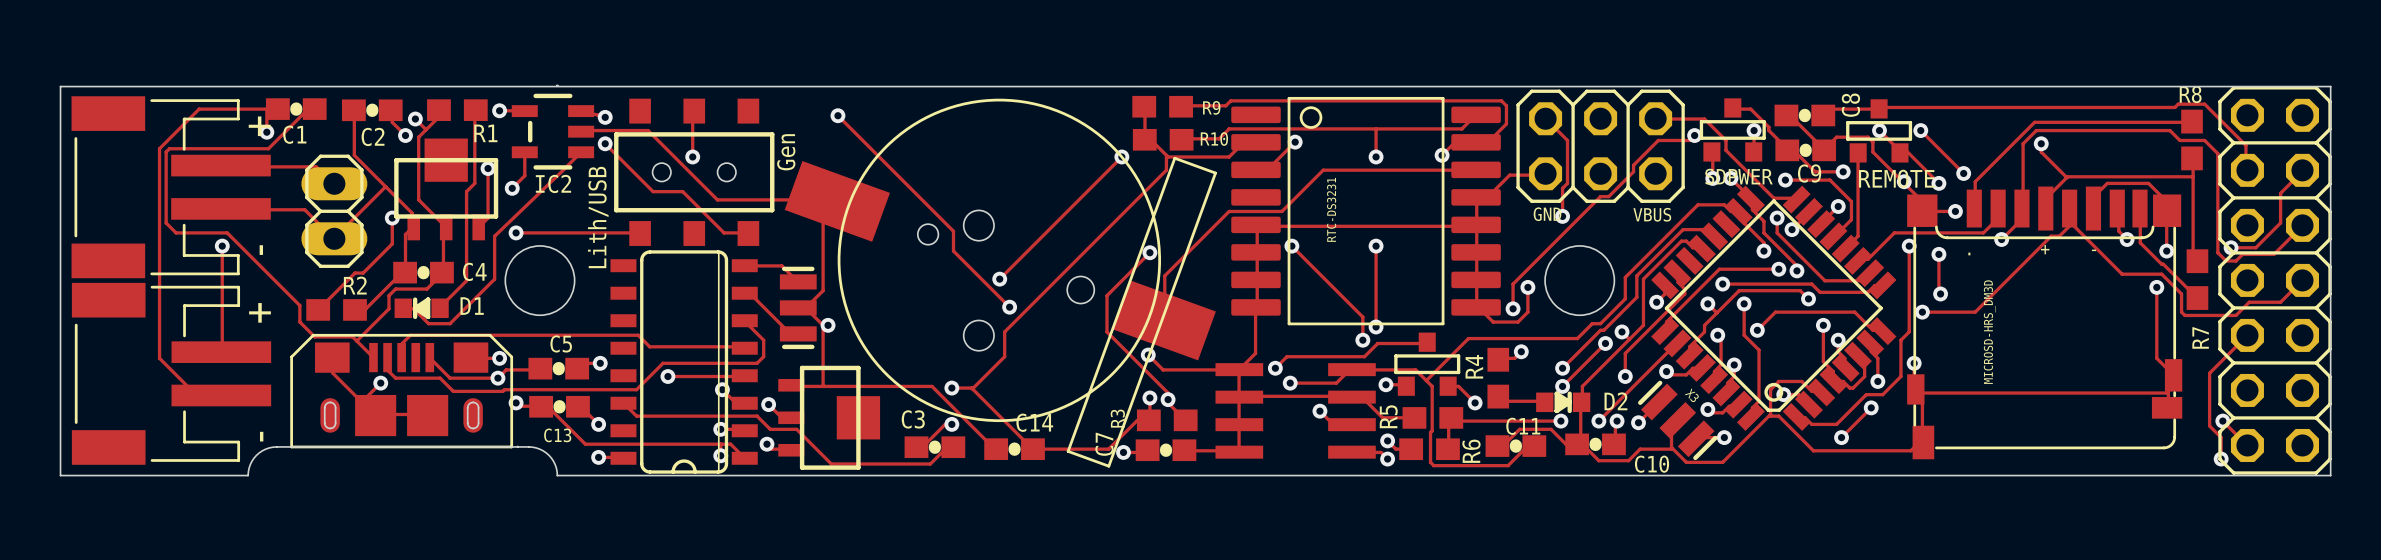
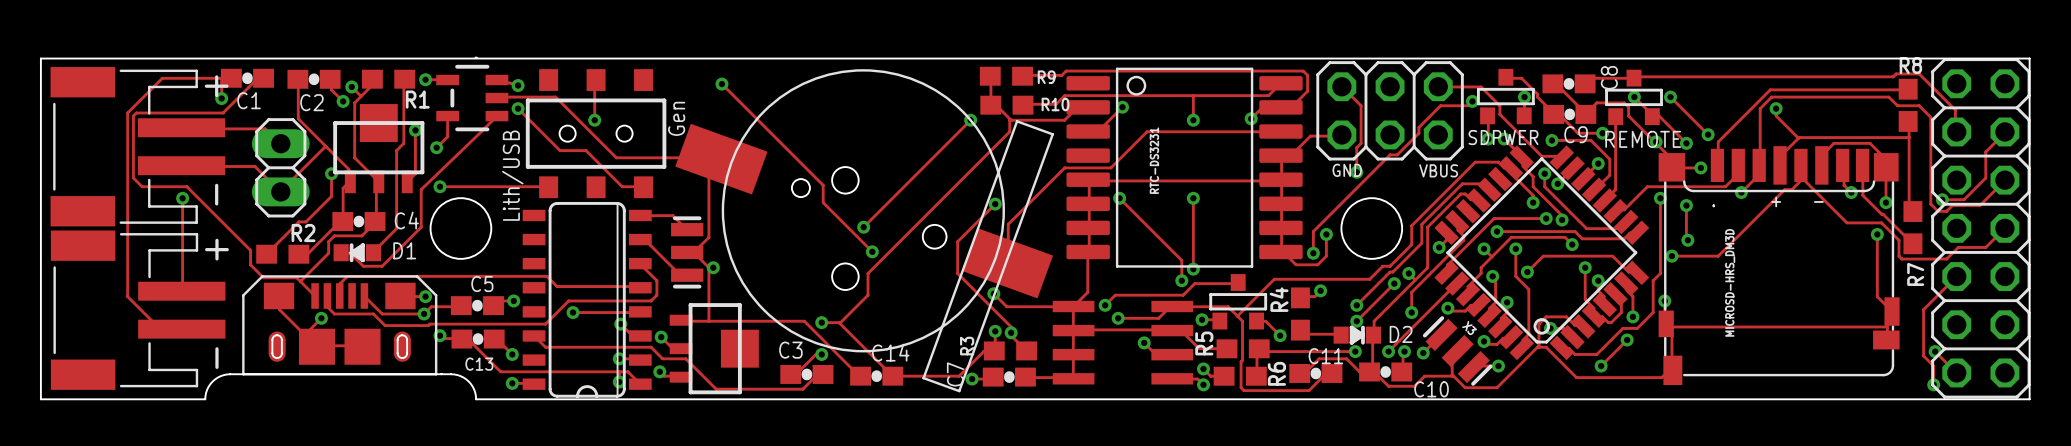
text: IC2 (553, 183) -> none

